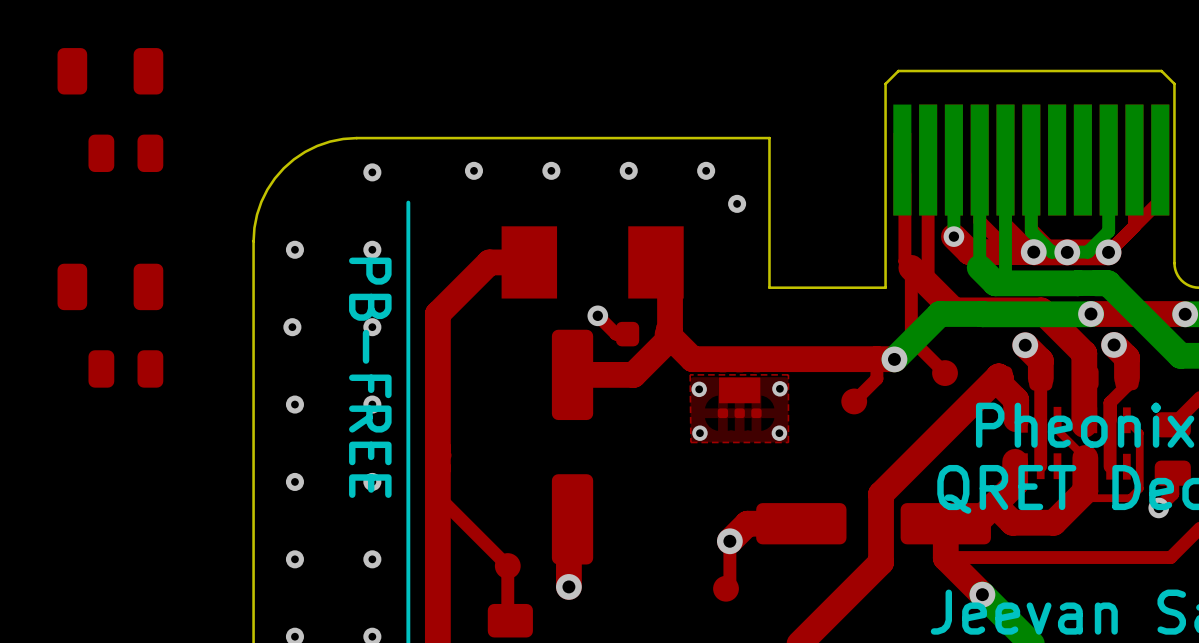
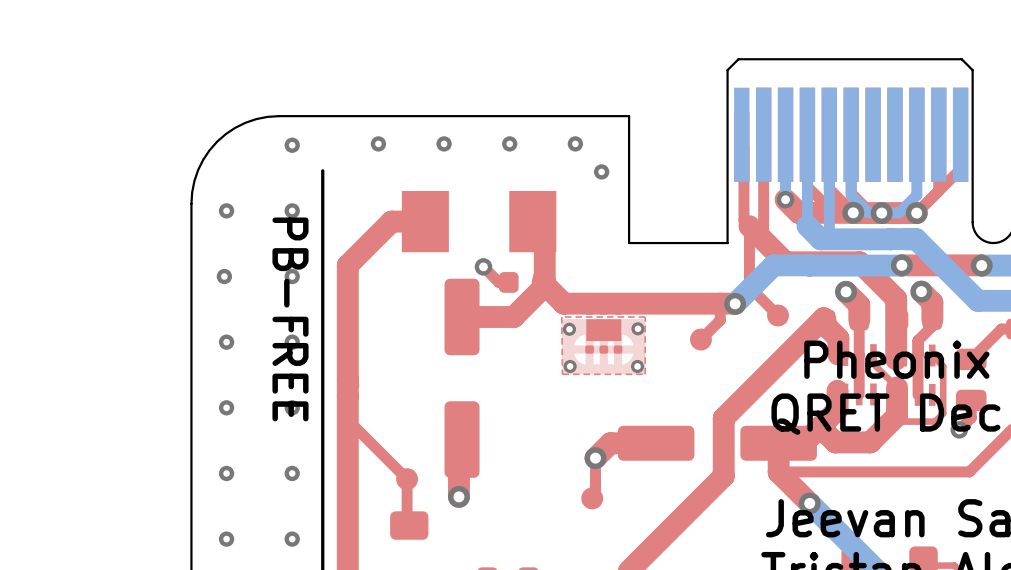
part: (110, 71) -> none
part: (125, 153) -> none
part: (110, 286) -> none
part: (125, 368) -> none

